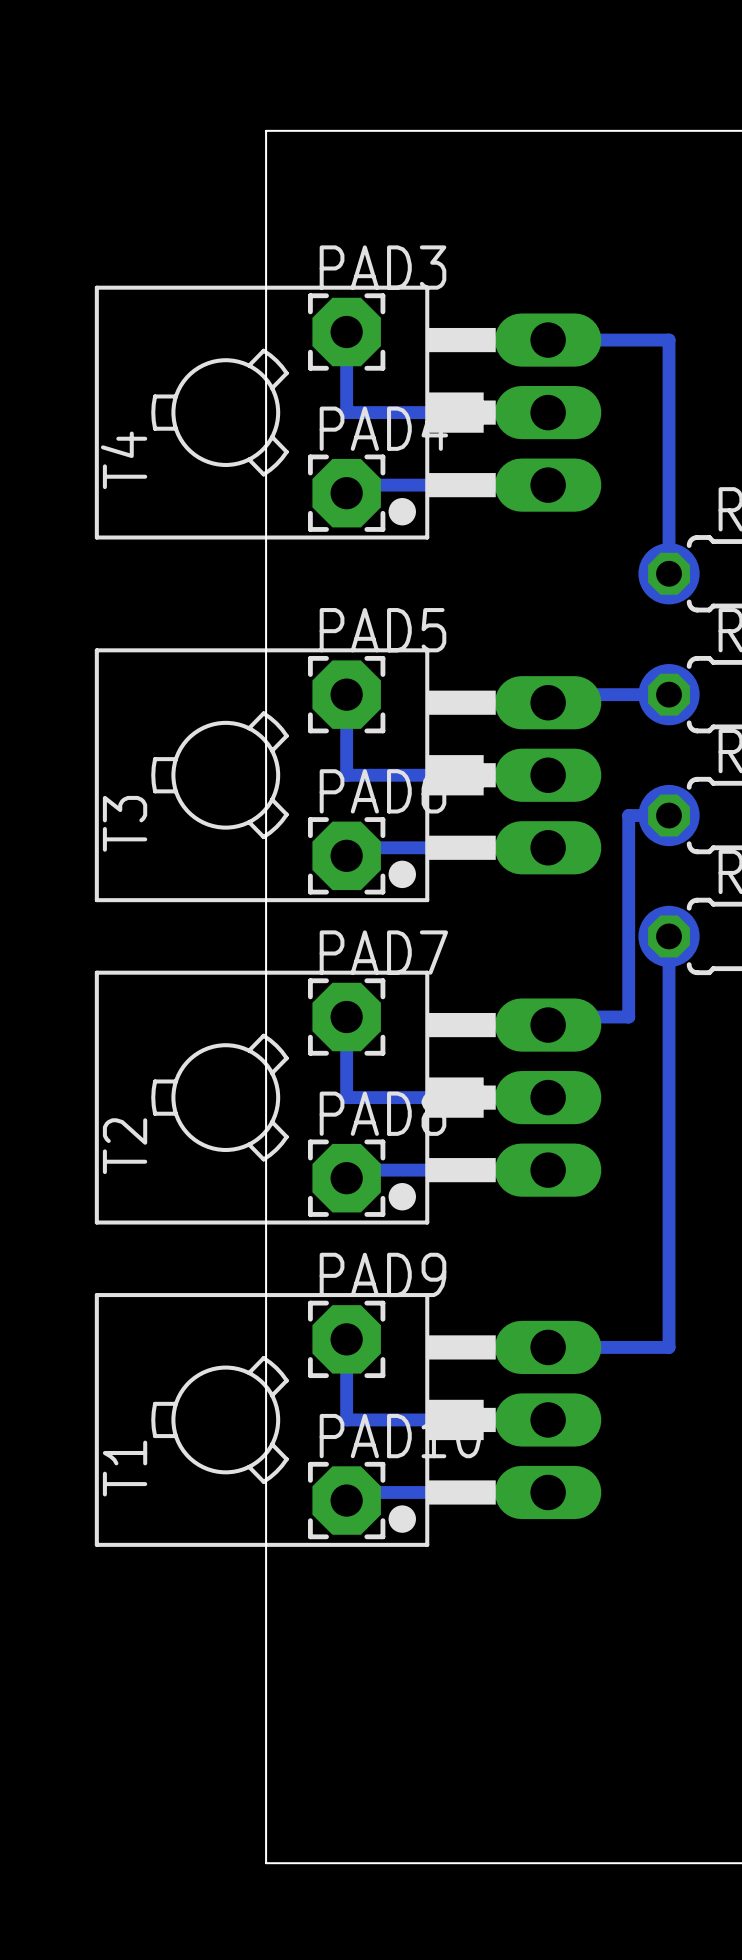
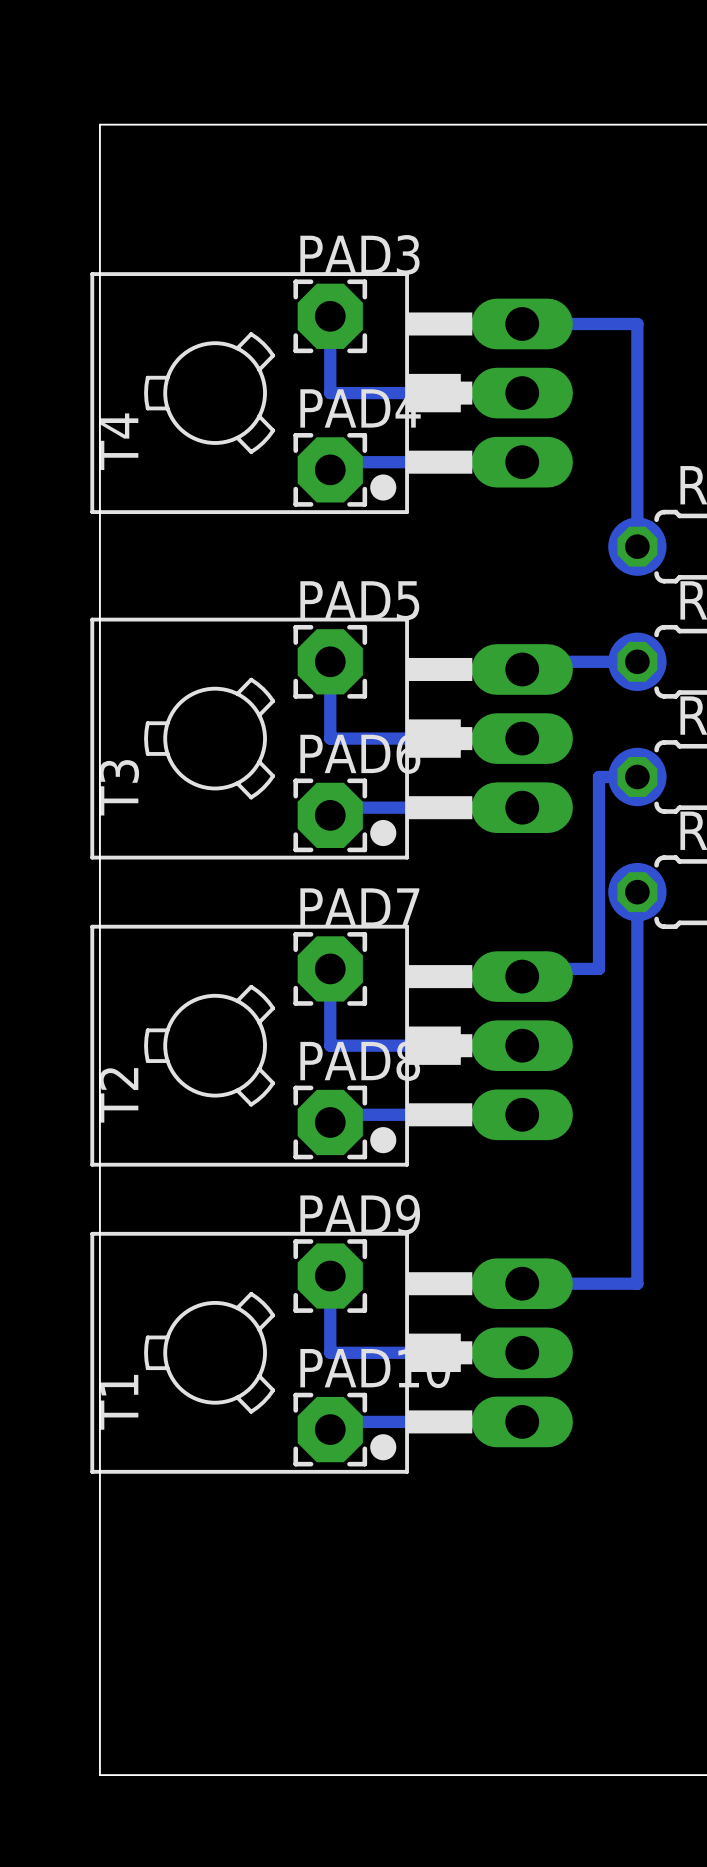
board edge: (266, 130) (266, 1863) -> (253, 124) (99, 124) (99, 1775) (253, 1775)

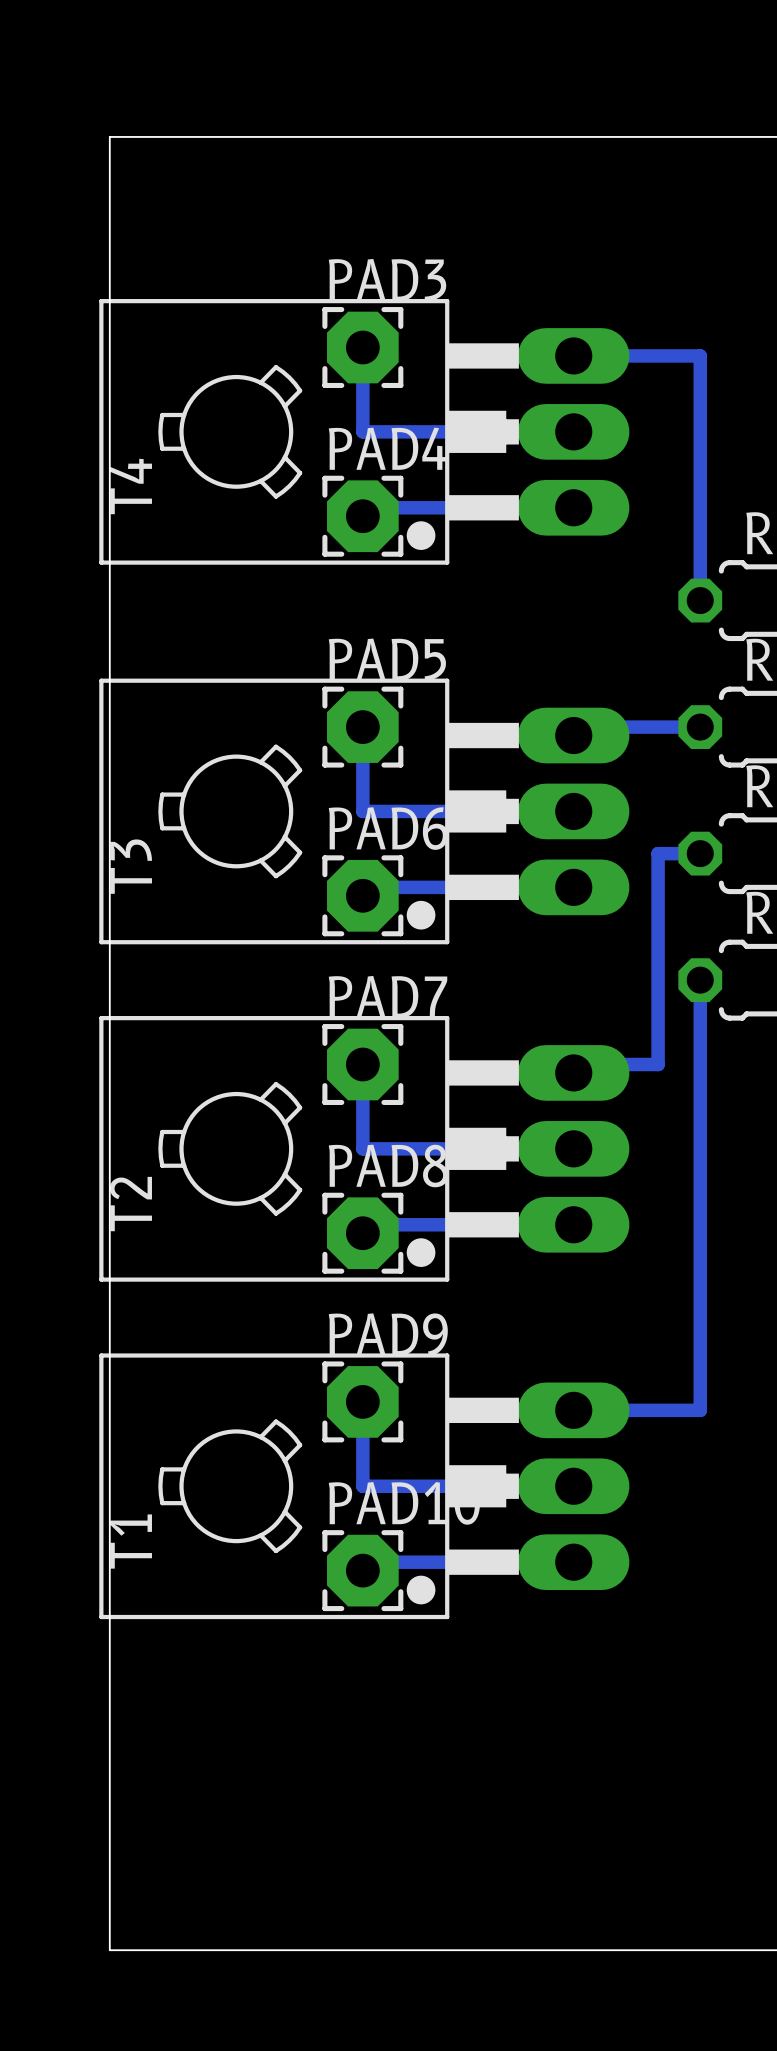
drawing: [608, 517, 667, 576] -> none
drawing: [608, 632, 667, 691] -> none
drawing: [608, 747, 667, 807] -> none
drawing: [608, 862, 667, 922] -> none

